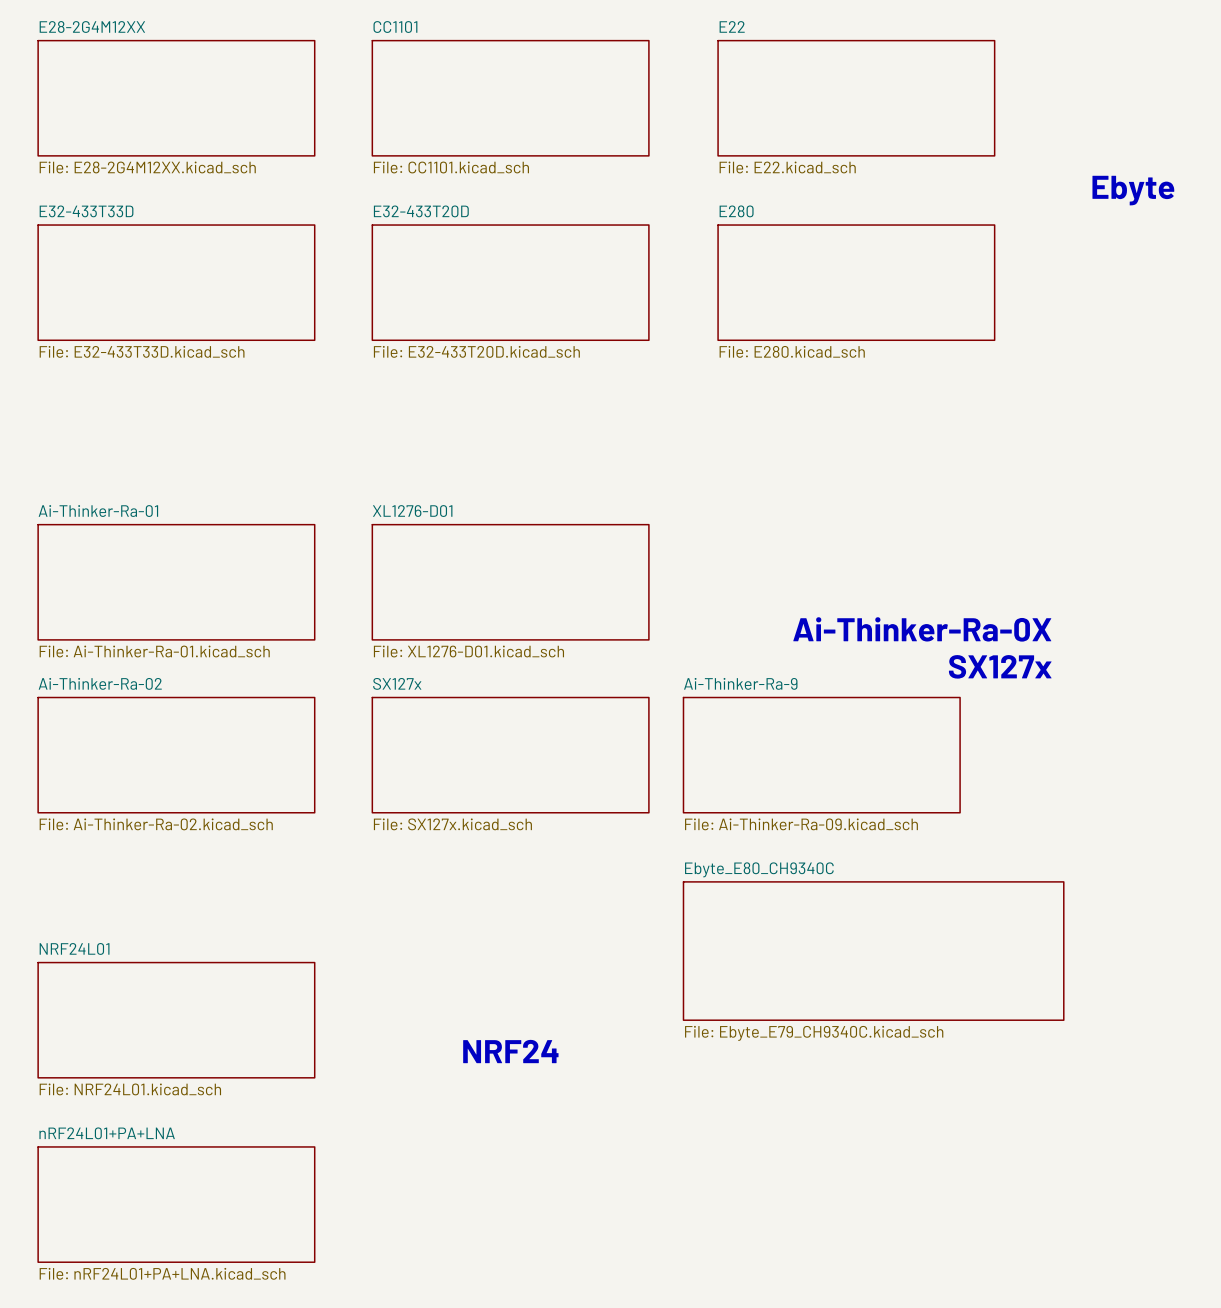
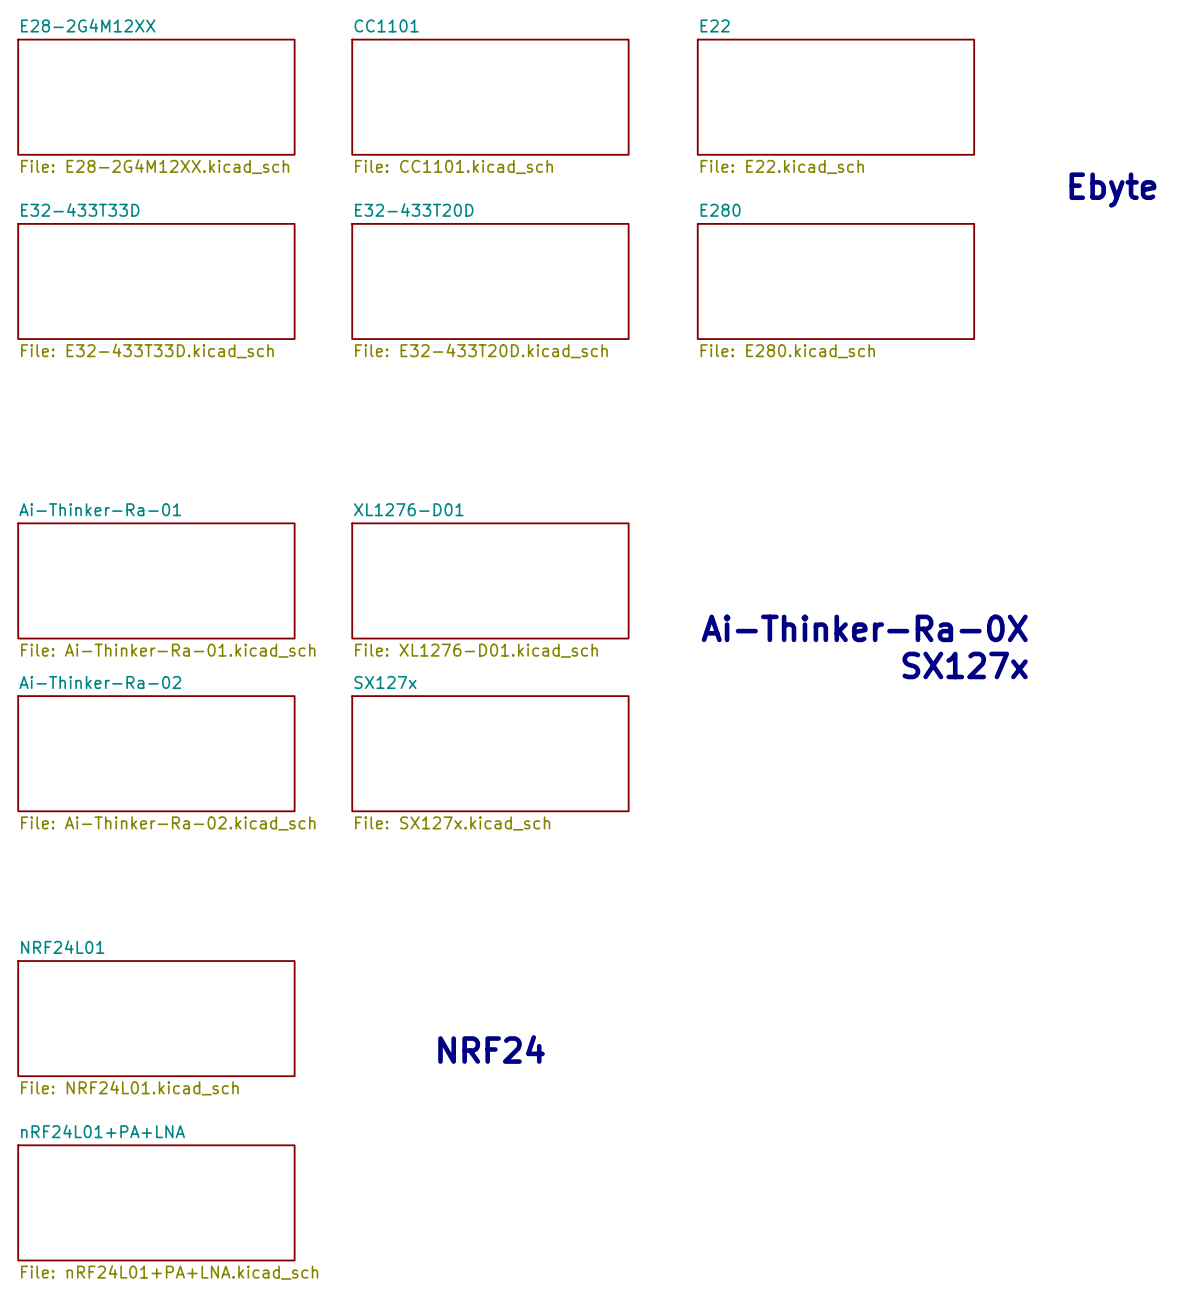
sheet Ai-Thinker-Ra-9: File: Ai-Thinker-Ra-09.kicad_sch (821, 755) -> none
sheet Ebyte_E80_CH9340C: File: Ebyte_E79_CH9340C.kicad_sch (873, 951) -> none

